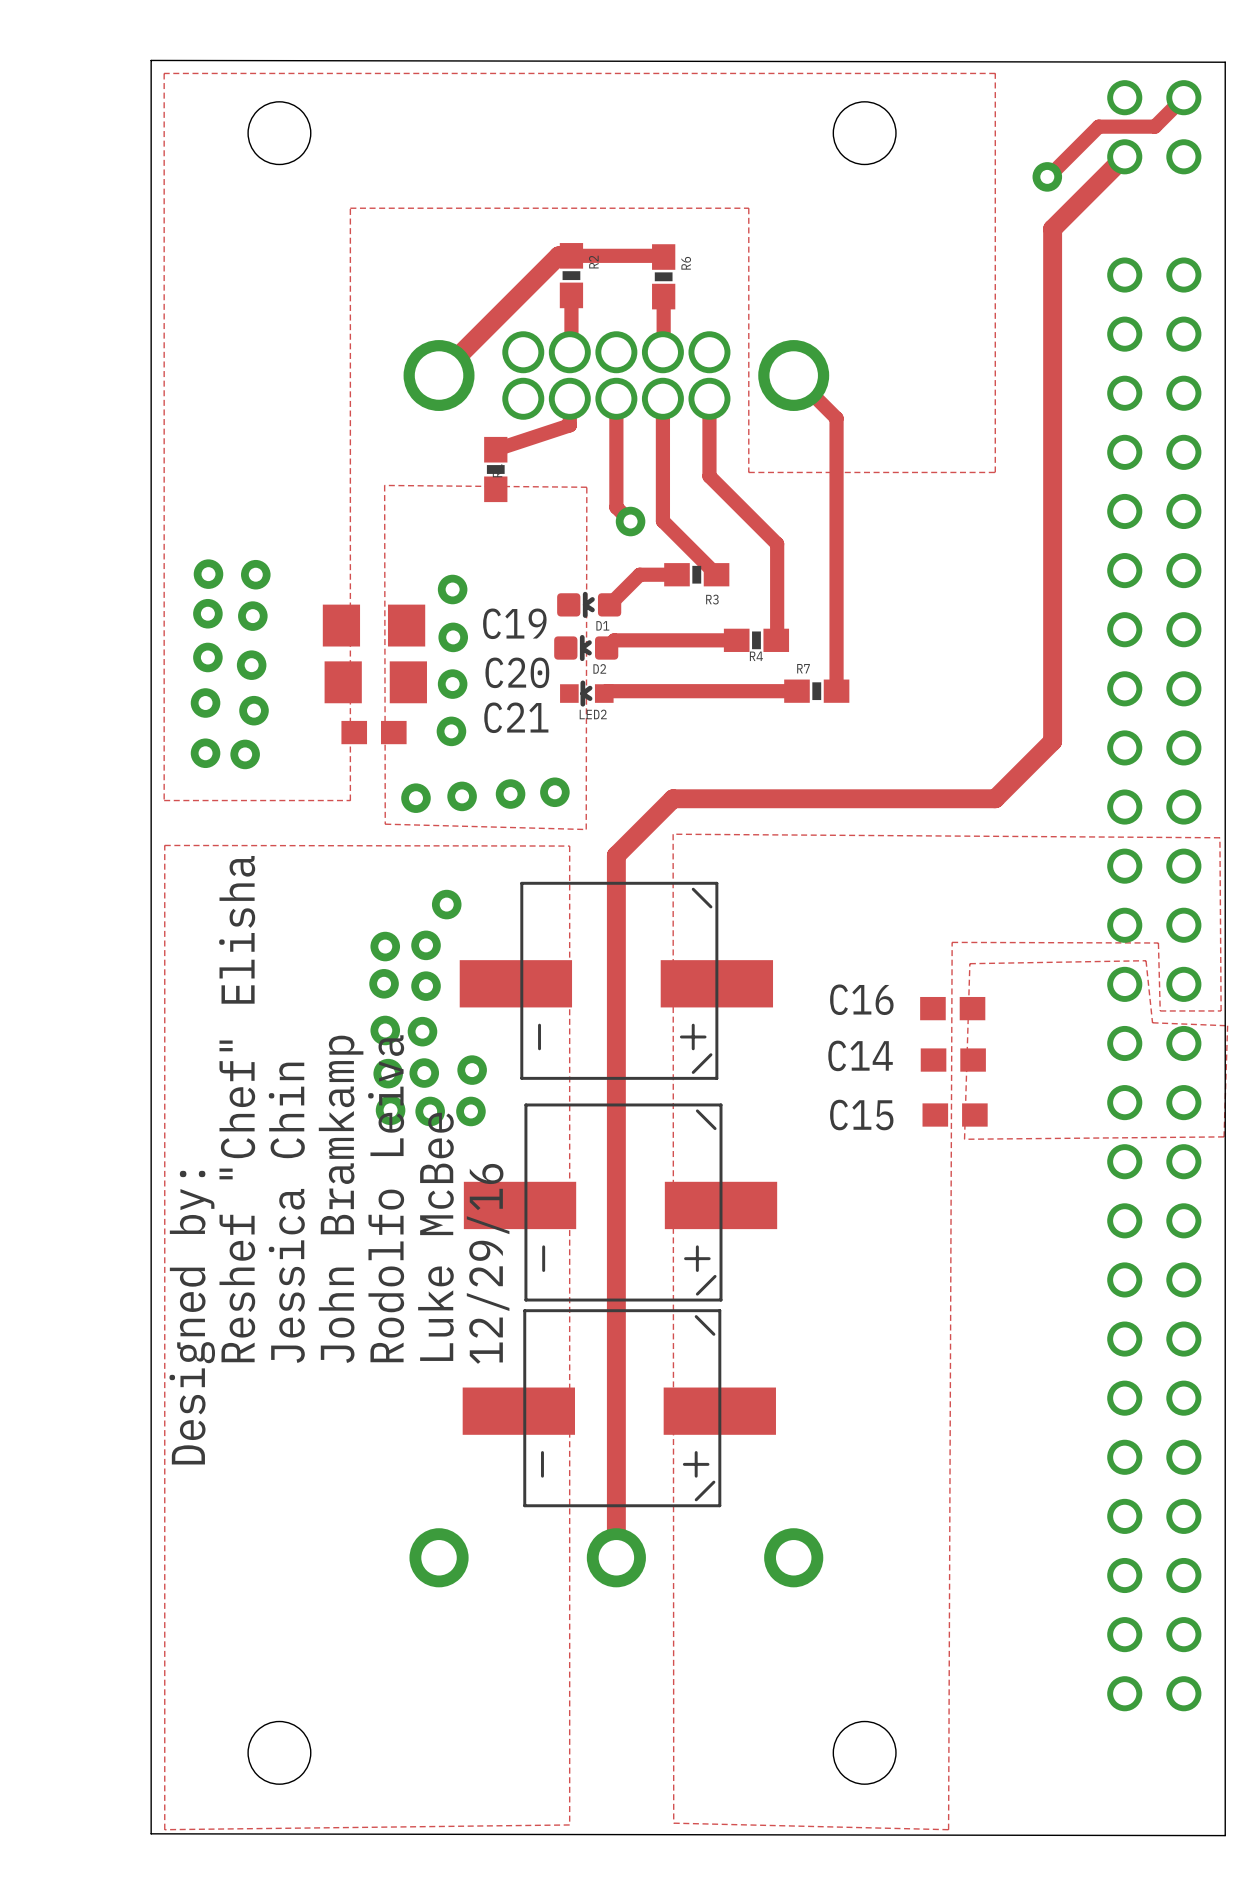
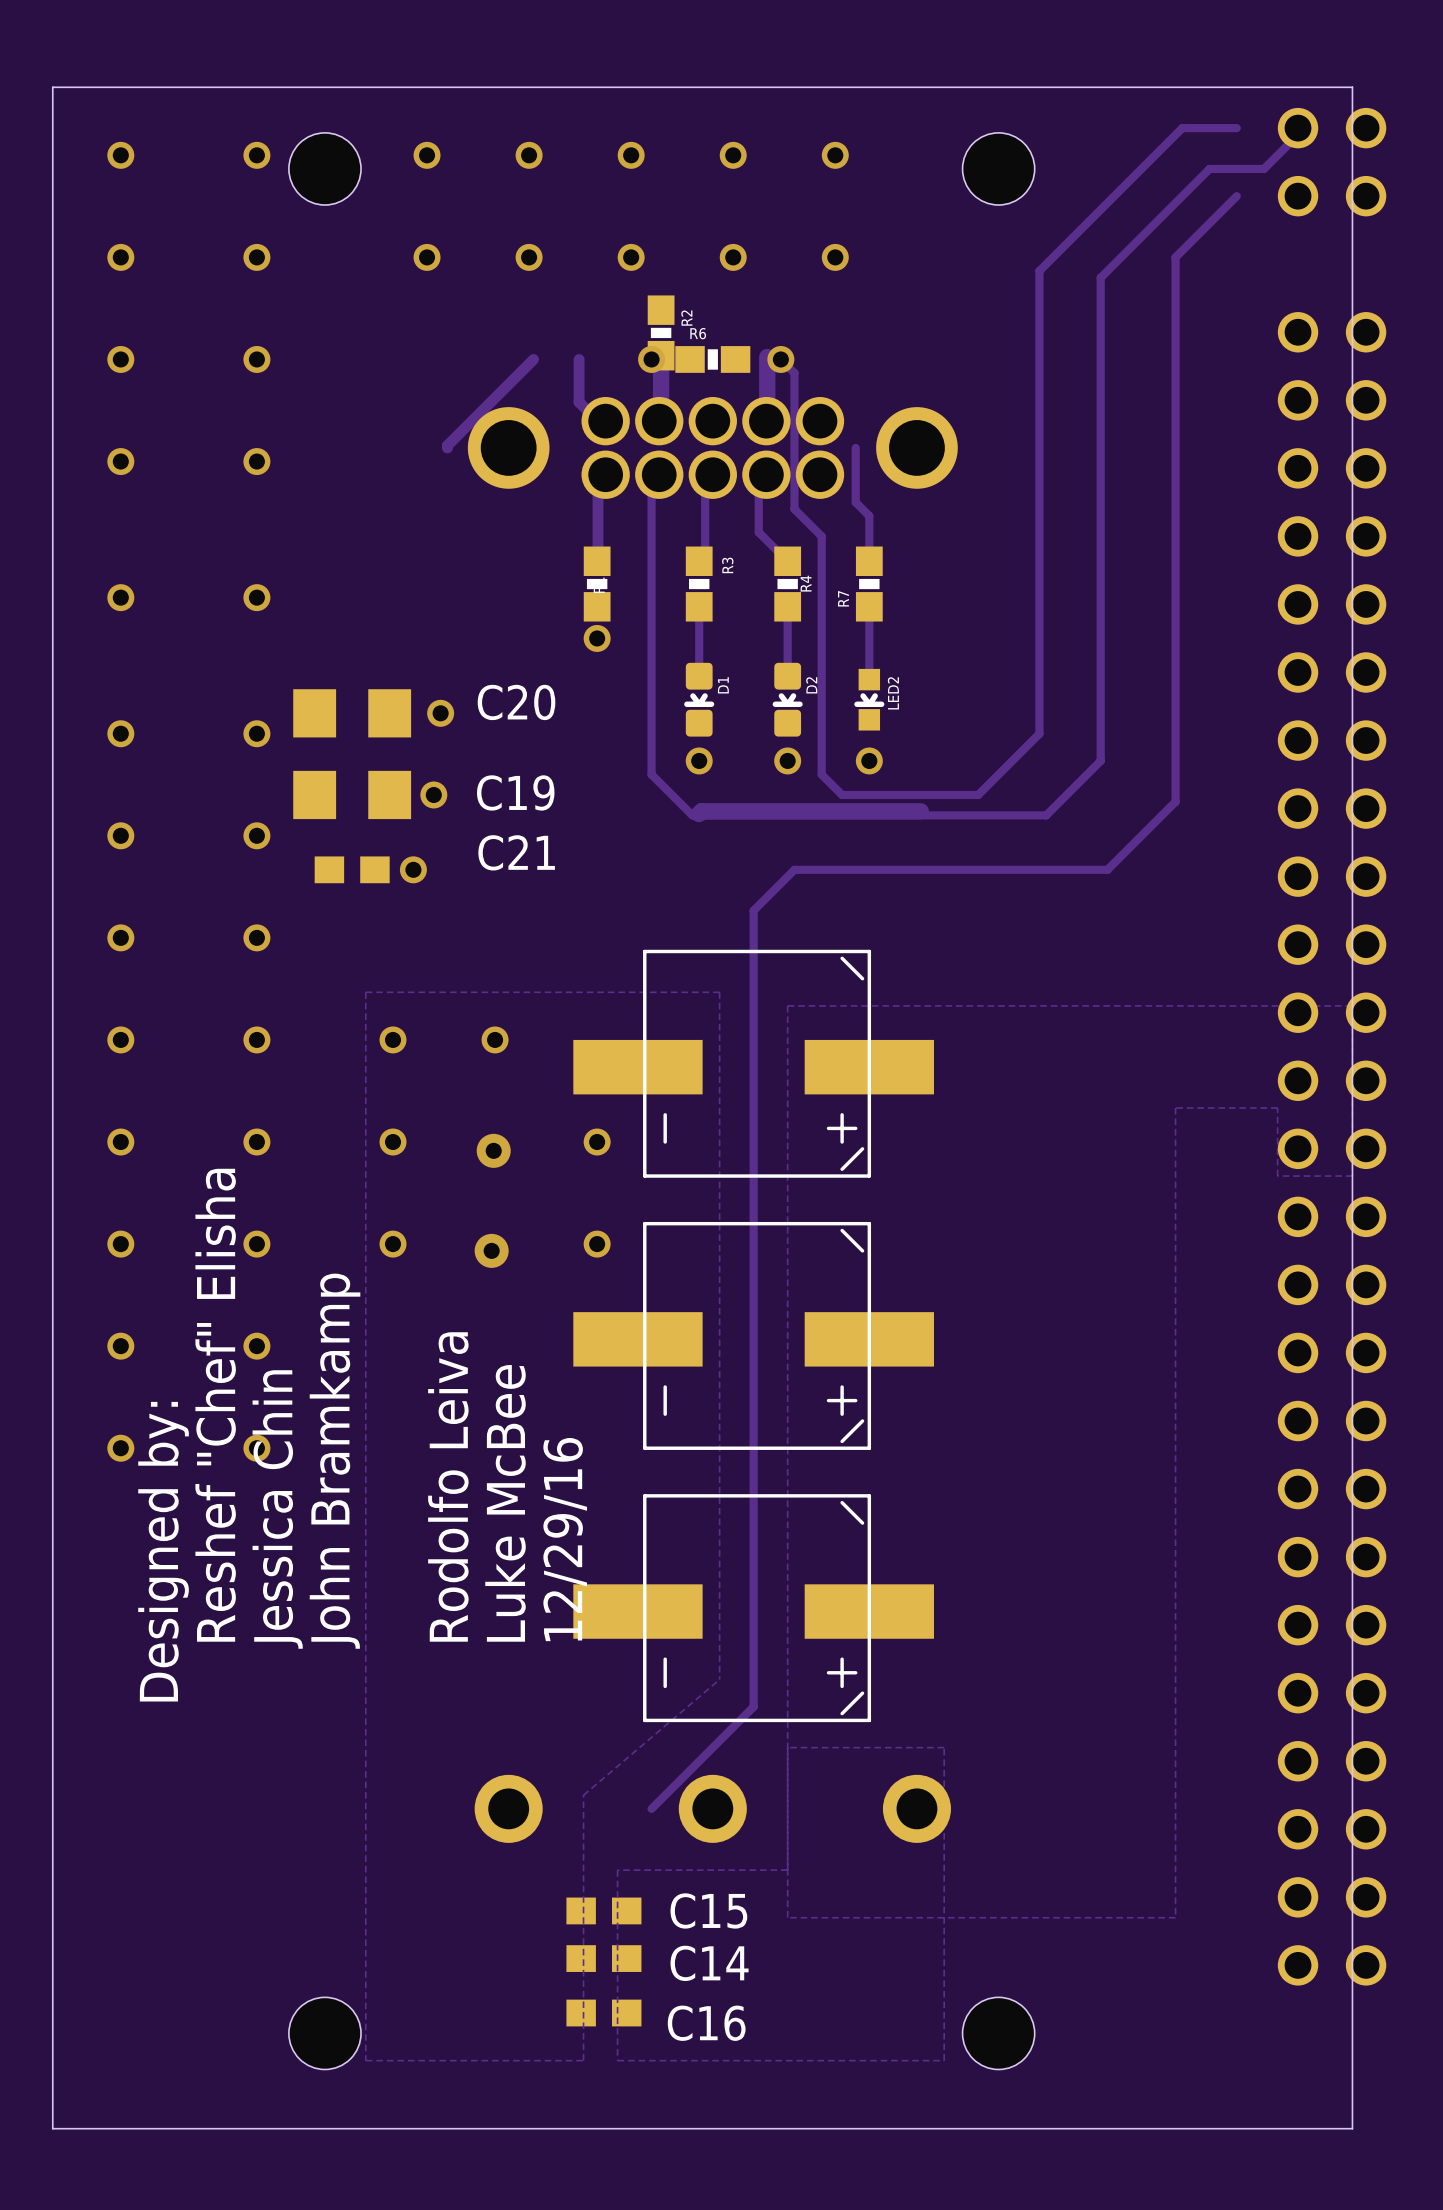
board edge: (151, 60) (1225, 62) (1225, 1835) (151, 1833) (151, 60) -> (52, 87) (52, 2128) (1352, 2128) (1352, 87) (52, 87)
zone outline: (164, 73) (995, 73) (995, 472) (748, 472) (748, 208) (350, 208) (350, 800) (164, 800) (164, 73) -> none
track: none -> (1236, 128) (1182, 128) (1039, 271) (1039, 733) (978, 794) (842, 794) (821, 774) (821, 536) (794, 509) (794, 373) (780, 359)
track: none -> (1304, 128) (1264, 168) (1209, 168) (1100, 277) (1100, 760) (1046, 815) (692, 815) (651, 774) (651, 474)
track: (1183, 97) (1154, 126) (1098, 126) (1047, 176) -> none
via: none -> (120, 155)
via: none -> (256, 155)
via: none -> (427, 155)
via: none -> (529, 155)
via: none -> (631, 155)
via: none -> (733, 155)
via: none -> (835, 155)
track: none -> (1236, 196) (1175, 257) (1175, 801) (1107, 869) (794, 869) (753, 910) (753, 1706) (651, 1808)
track: (1124, 156) (1052, 228) (1052, 741) (995, 798) (673, 798) (616, 855) (616, 1557) -> none
via: (1047, 176) -> none
via: none -> (120, 257)
via: none -> (256, 257)
via: none -> (427, 257)
via: none -> (529, 257)
via: none -> (631, 257)
via: none -> (733, 257)
via: none -> (835, 257)
track: (663, 257) (558, 255) (439, 375) -> none
R6 rotation: 0° (663, 276) -> 90° clockwise (712, 359)
R6 position: (663, 276) -> (712, 359)
via: none -> (120, 359)
via: none -> (256, 359)
track: none -> (533, 359) (447, 445) (447, 447)
track: none -> (579, 359) (579, 402) (598, 421)
via: none -> (651, 359)
via: none -> (780, 359)
track: none -> (855, 447) (855, 502) (869, 515) (869, 561)
track: (793, 375) (836, 418) (836, 691) -> none
via: none -> (120, 461)
via: none -> (256, 461)
track: none -> (598, 474) (597, 561)
track: (569, 398) (569, 425) (495, 449) -> none
track: none -> (705, 474) (705, 555) (699, 561)
track: (616, 398) (616, 507) (630, 521) -> none
track: none -> (758, 474) (758, 532) (787, 561)
track: (662, 398) (662, 521) (716, 574) -> none
track: (709, 398) (709, 476) (777, 543) (776, 640) -> none
part position: (495, 469) -> (597, 584)
zone outline: (384, 485) (586, 487) (586, 829) (385, 824) (384, 485) -> none
via: none -> (120, 597)
via: none -> (256, 597)
track: none -> (699, 606) (699, 676)
track: none -> (787, 606) (787, 676)
track: none -> (869, 606) (869, 679)
via: (630, 521) -> none
via: none -> (597, 638)
via: (208, 574) -> none
via: (255, 574) -> none
track: (676, 574) (639, 574) (609, 604) -> none
R3 rotation: 0° (696, 574) -> 90° clockwise (699, 584)
R3 position: (696, 574) -> (699, 584)
via: (452, 589) -> none
D1 rotation: 0° (589, 604) -> 90° counterclockwise (699, 699)
via: none -> (440, 713)
via position: (207, 613) -> (256, 733)
via: (252, 616) -> none
via: none -> (120, 733)
C19 position: (374, 625) -> (352, 794)
via: (453, 637) -> none
track: (736, 640) (614, 640) (606, 648) -> none
R4 rotation: 0° (756, 640) -> 90° clockwise (787, 584)
R4 position: (756, 640) -> (787, 584)
via: none -> (699, 760)
via: none -> (787, 760)
via: none -> (869, 760)
D2 rotation: 0° (586, 648) -> 90° counterclockwise (787, 699)
D2 position: (586, 648) -> (787, 699)
via: (207, 657) -> none
via: (251, 665) -> none
via: none -> (433, 794)
C20 position: (375, 682) -> (352, 713)
via: (452, 684) -> none
R7 rotation: 0° (816, 691) -> 90° clockwise (869, 584)
R7 position: (816, 691) -> (869, 584)
LED2 rotation: 0° (586, 693) -> 90° counterclockwise (869, 699)
LED2 position: (586, 693) -> (869, 699)
via position: (205, 703) -> (256, 835)
via: (254, 710) -> none
via: none -> (120, 835)
via: (451, 731) -> none
C21 position: (374, 732) -> (352, 869)
via: none -> (413, 869)
via: (205, 753) -> none
via: (245, 754) -> none
via: (554, 792) -> none
via: (510, 794) -> none
via: (462, 796) -> none
via: (415, 798) -> none
via: none -> (120, 937)
via: none -> (256, 937)
zone outline: (673, 834) (1219, 837) (1221, 1010) (1160, 1010) (1158, 943) (952, 942) (948, 1829) (673, 1823) (673, 834) -> (787, 1005) (787, 1917) (1175, 1917) (1175, 1107) (1277, 1107) (1277, 1176) (1352, 1176) (1352, 1005) (787, 1005)
zone outline: (164, 845) (164, 1829) (569, 1824) (569, 846) (164, 845) -> (365, 992) (365, 2060) (583, 2060) (583, 1795) (719, 1679) (719, 992) (365, 992)
via: none -> (120, 1039)
via: none -> (256, 1039)
via: none -> (393, 1039)
via: none -> (495, 1039)
via: (446, 904) -> none
via: (426, 945) -> none
via: (385, 946) -> none
zone outline: (1146, 960) (969, 963) (964, 1139) (1224, 1136) (1227, 1025) (1152, 1022) (1146, 960) -> none
via: none -> (120, 1142)
via: none -> (256, 1142)
via: none -> (393, 1142)
via: none -> (597, 1142)
part position: (616, 980) -> (753, 1063)
via: (384, 983) -> none
C16 name position: C16 (861, 999) -> C16 (706, 2023)
C16 position: (952, 1008) -> (603, 2013)
via: (385, 1030) -> none
via: (422, 1031) -> none
C14 name position: C14 (860, 1055) -> C14 (709, 1963)
C14 position: (953, 1060) -> (603, 1958)
via: none -> (120, 1244)
via: none -> (256, 1244)
via: none -> (393, 1244)
via: none -> (597, 1244)
via: (472, 1070) -> none
via: (388, 1073) -> none
text position: Reshef "Chef" Elisha (237, 1109) -> Reshef "Chef" Elisha (215, 1405)
via: (390, 1110) -> none
via: (430, 1111) -> none
via: (470, 1111) -> none
C15 name position: C15 (861, 1115) -> C15 (708, 1910)
C15 position: (955, 1115) -> (603, 1910)
via: none -> (120, 1346)
via: none -> (256, 1346)
text position: John Bramkamp (341, 1199) -> John Bramkamp (335, 1461)
part position: (620, 1202) -> (753, 1335)
text position: Jessica Chin (286, 1212) -> Jessica Chin (277, 1509)
via: none -> (120, 1448)
via: none -> (256, 1448)
text position: Designed by: (192, 1317) -> Designed by: (163, 1551)
part position: (619, 1408) -> (753, 1608)
zone outline: none -> (787, 1747) (944, 1747) (944, 2060) (617, 2060) (617, 1870) (787, 1870)

